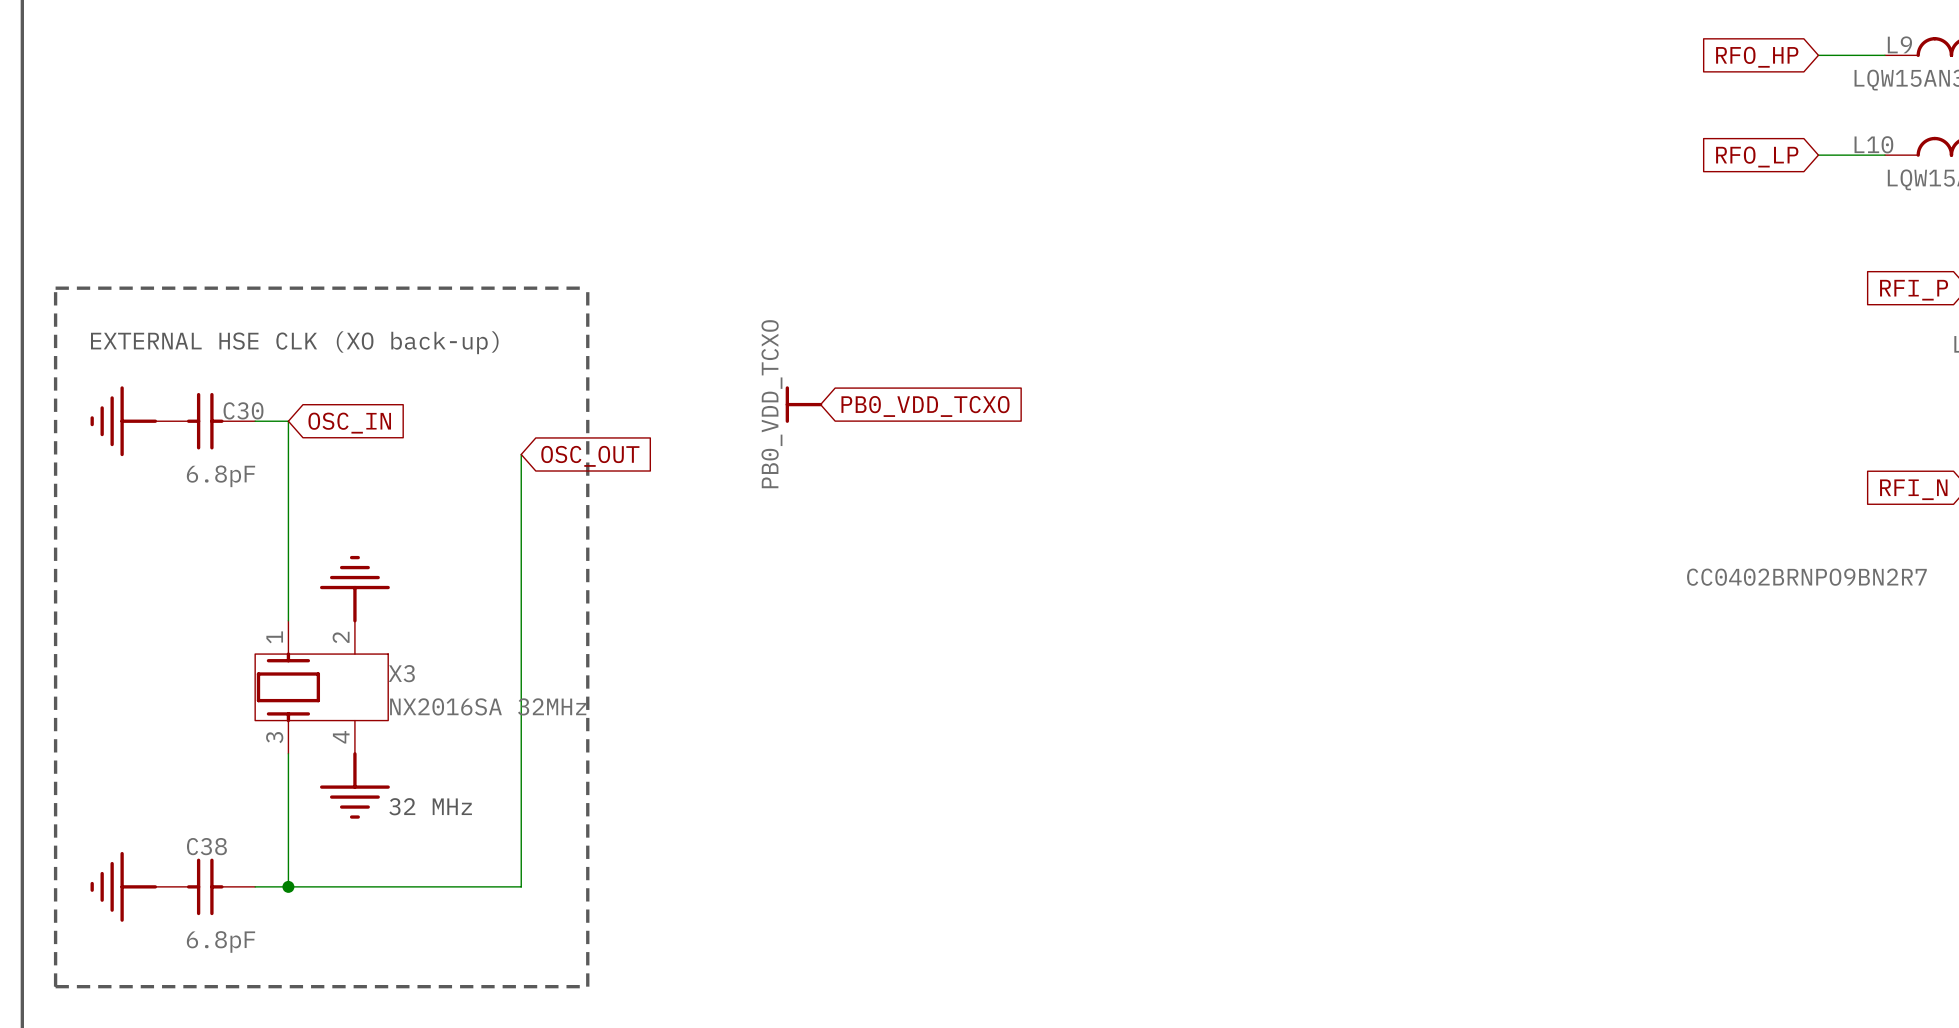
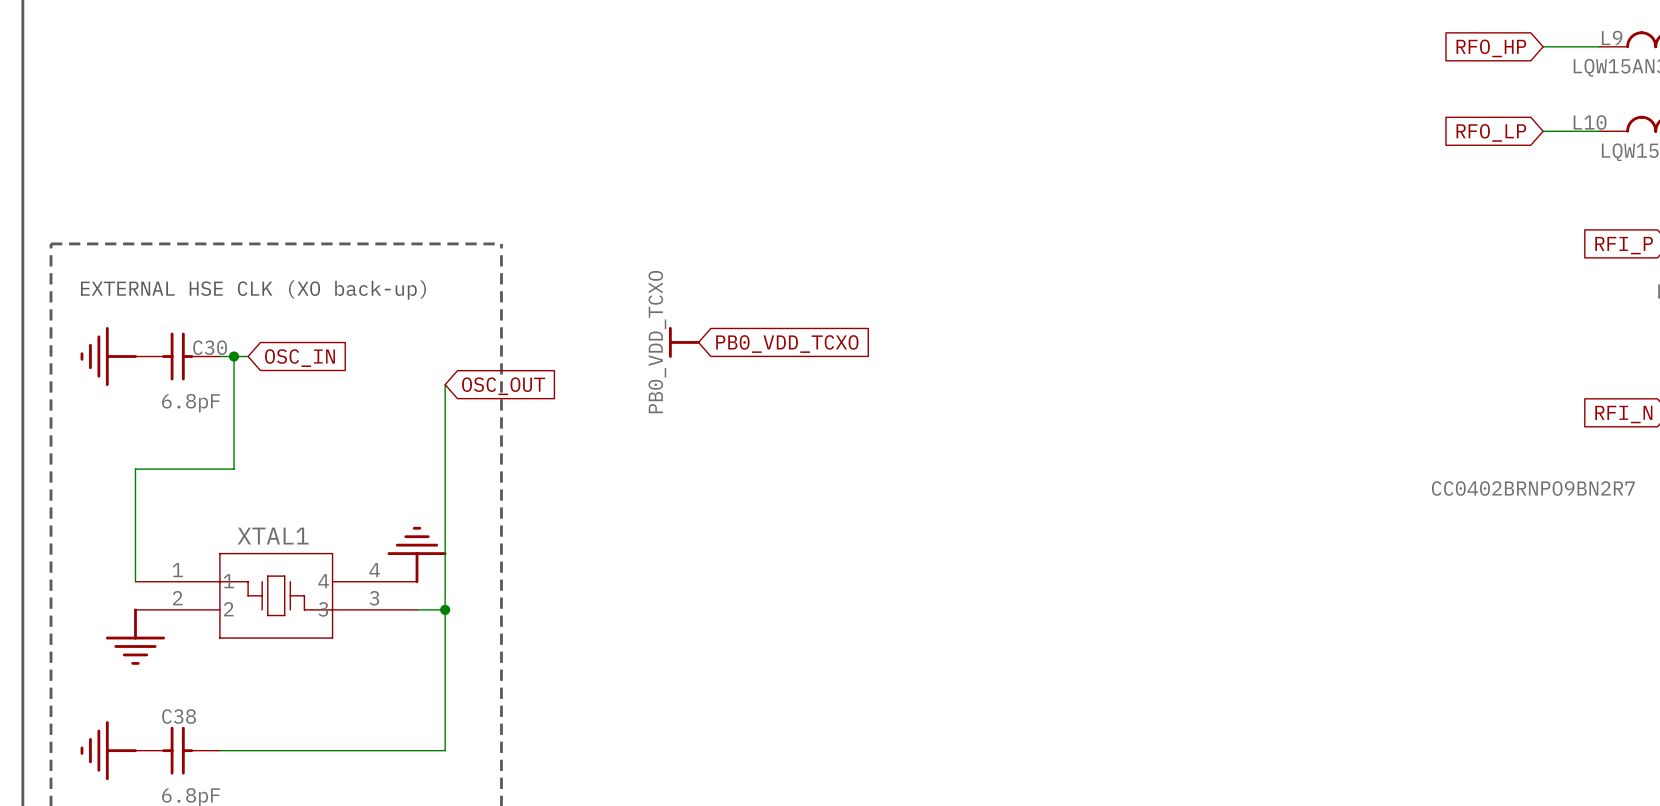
wire: none -> (234, 356) (234, 469) (135, 469) (135, 581)
junction: none -> (234, 356)
wire: (288, 421) (288, 620) -> none
power symbol: (354, 589) -> none
power symbol: none -> (417, 555)
X3: (321, 687) -> none
XTAL1: none -> (276, 595)
wire: none -> (417, 609) (445, 609)
junction: none -> (445, 609)
power symbol: none -> (135, 636)
wire: (288, 753) (288, 886) -> none
power symbol: (354, 785) -> none
text: 32 MHz (430, 806) -> none
junction: (288, 886) -> none

